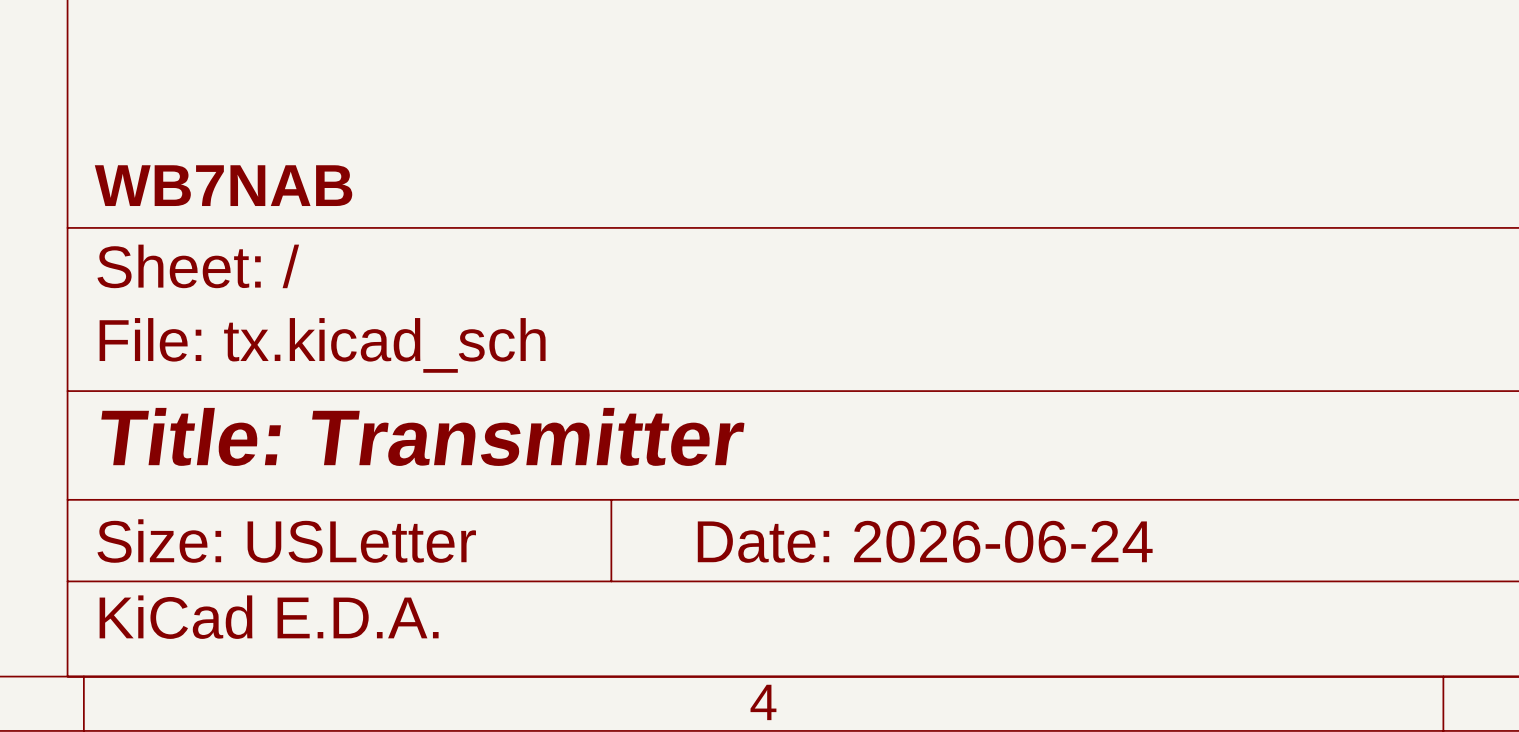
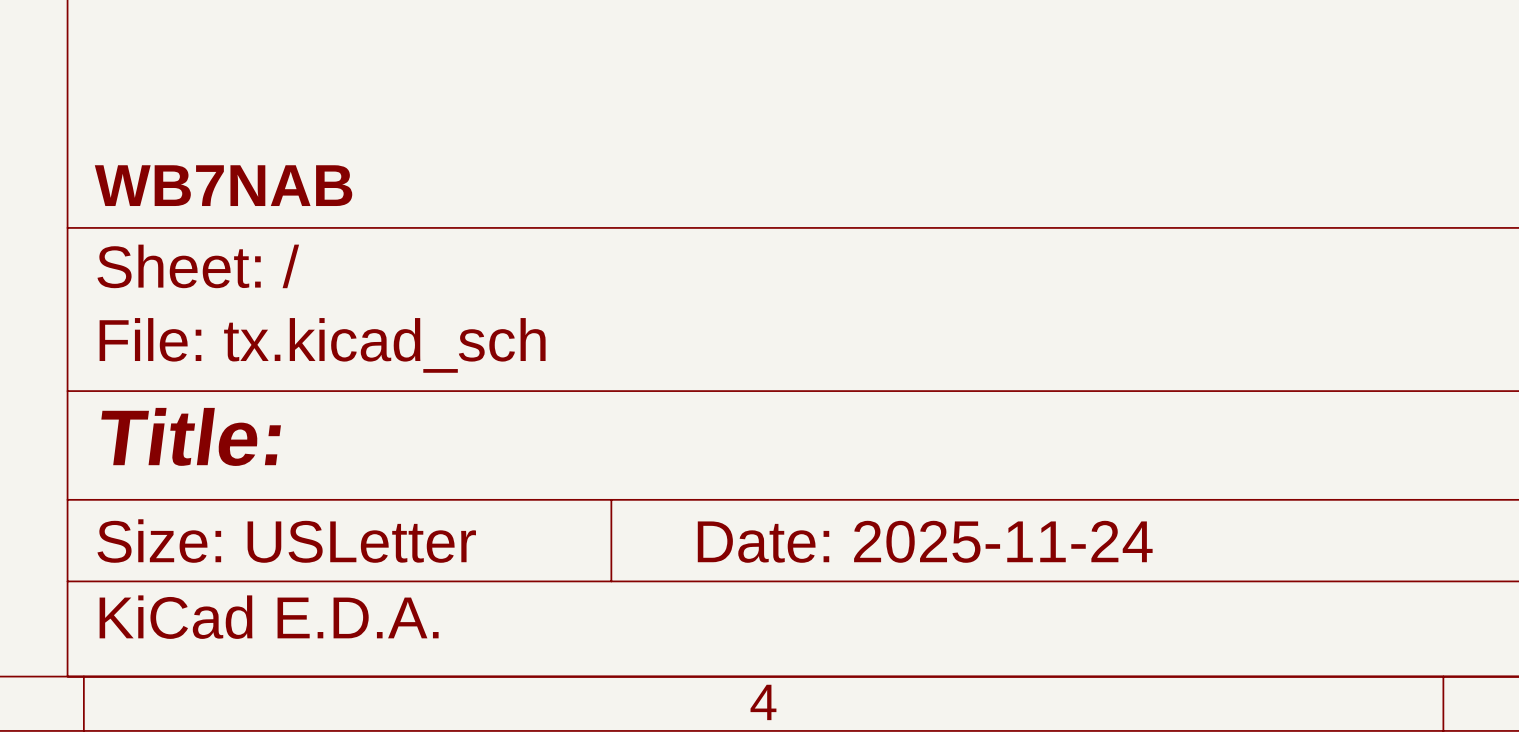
title block: Title: Transmitter (422, 436) -> Title: (191, 436)
title block: Date: 2026-06-24 (925, 541) -> Date: 2025-11-24 (925, 541)

